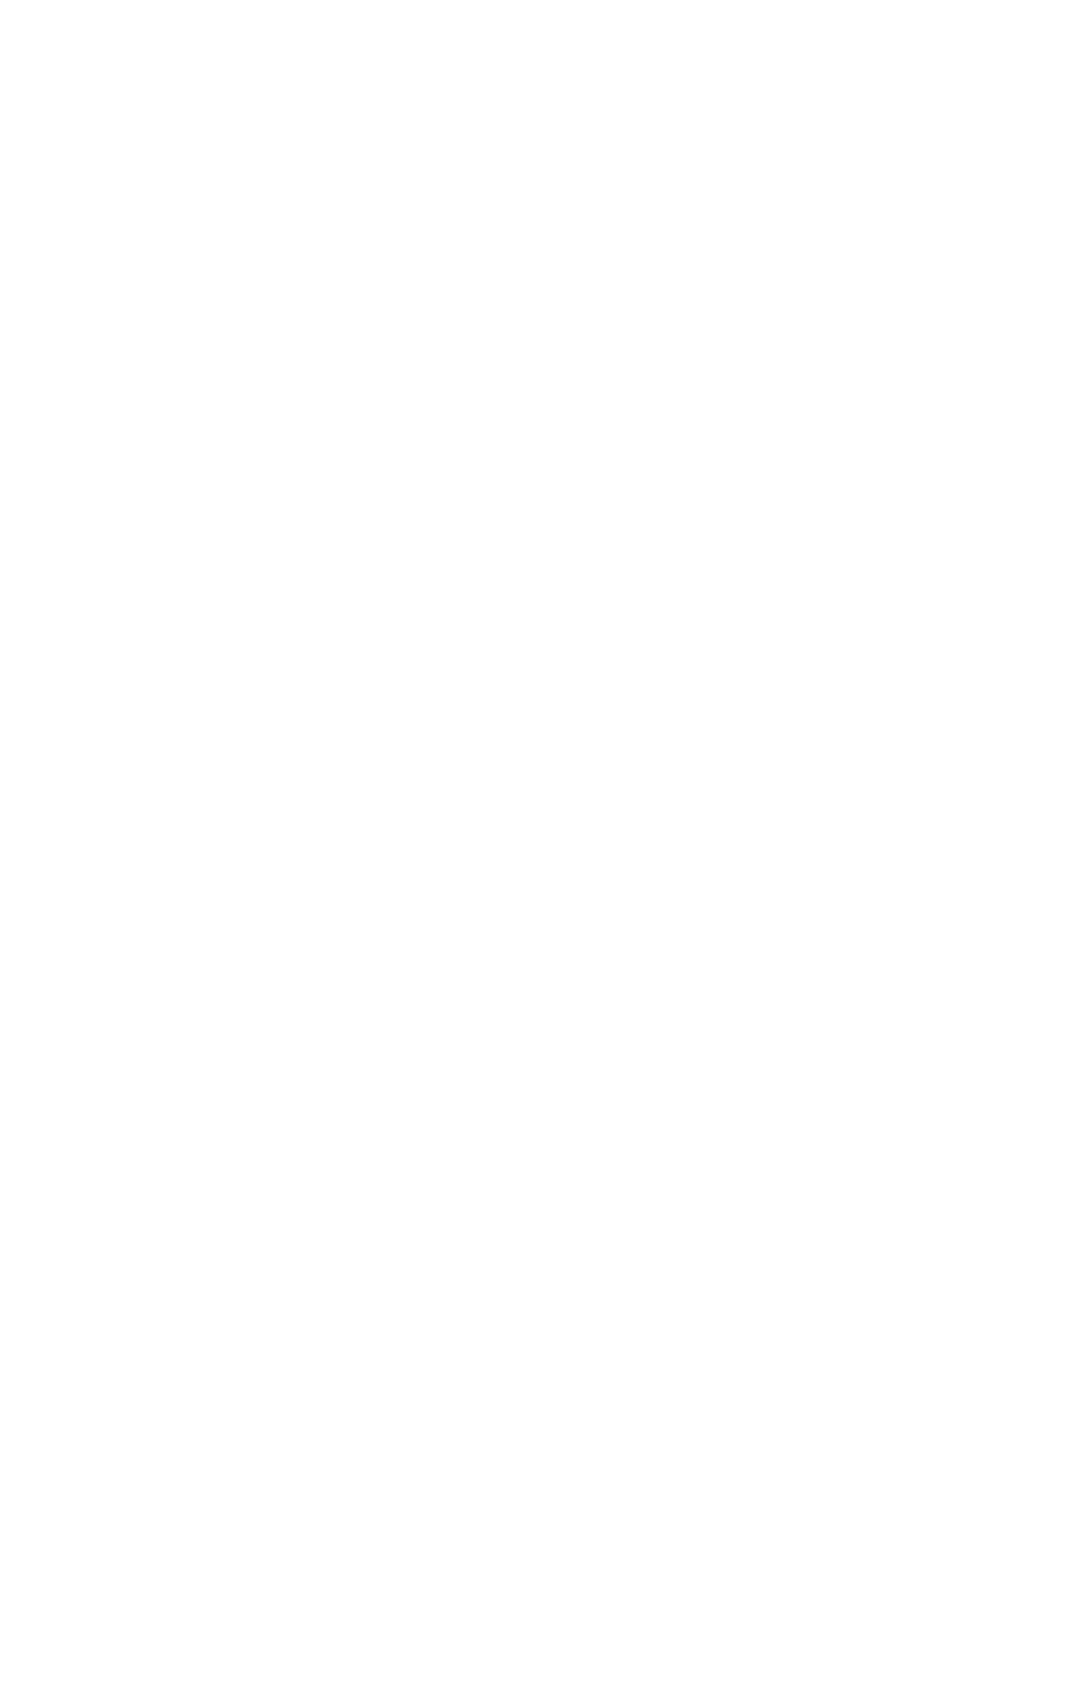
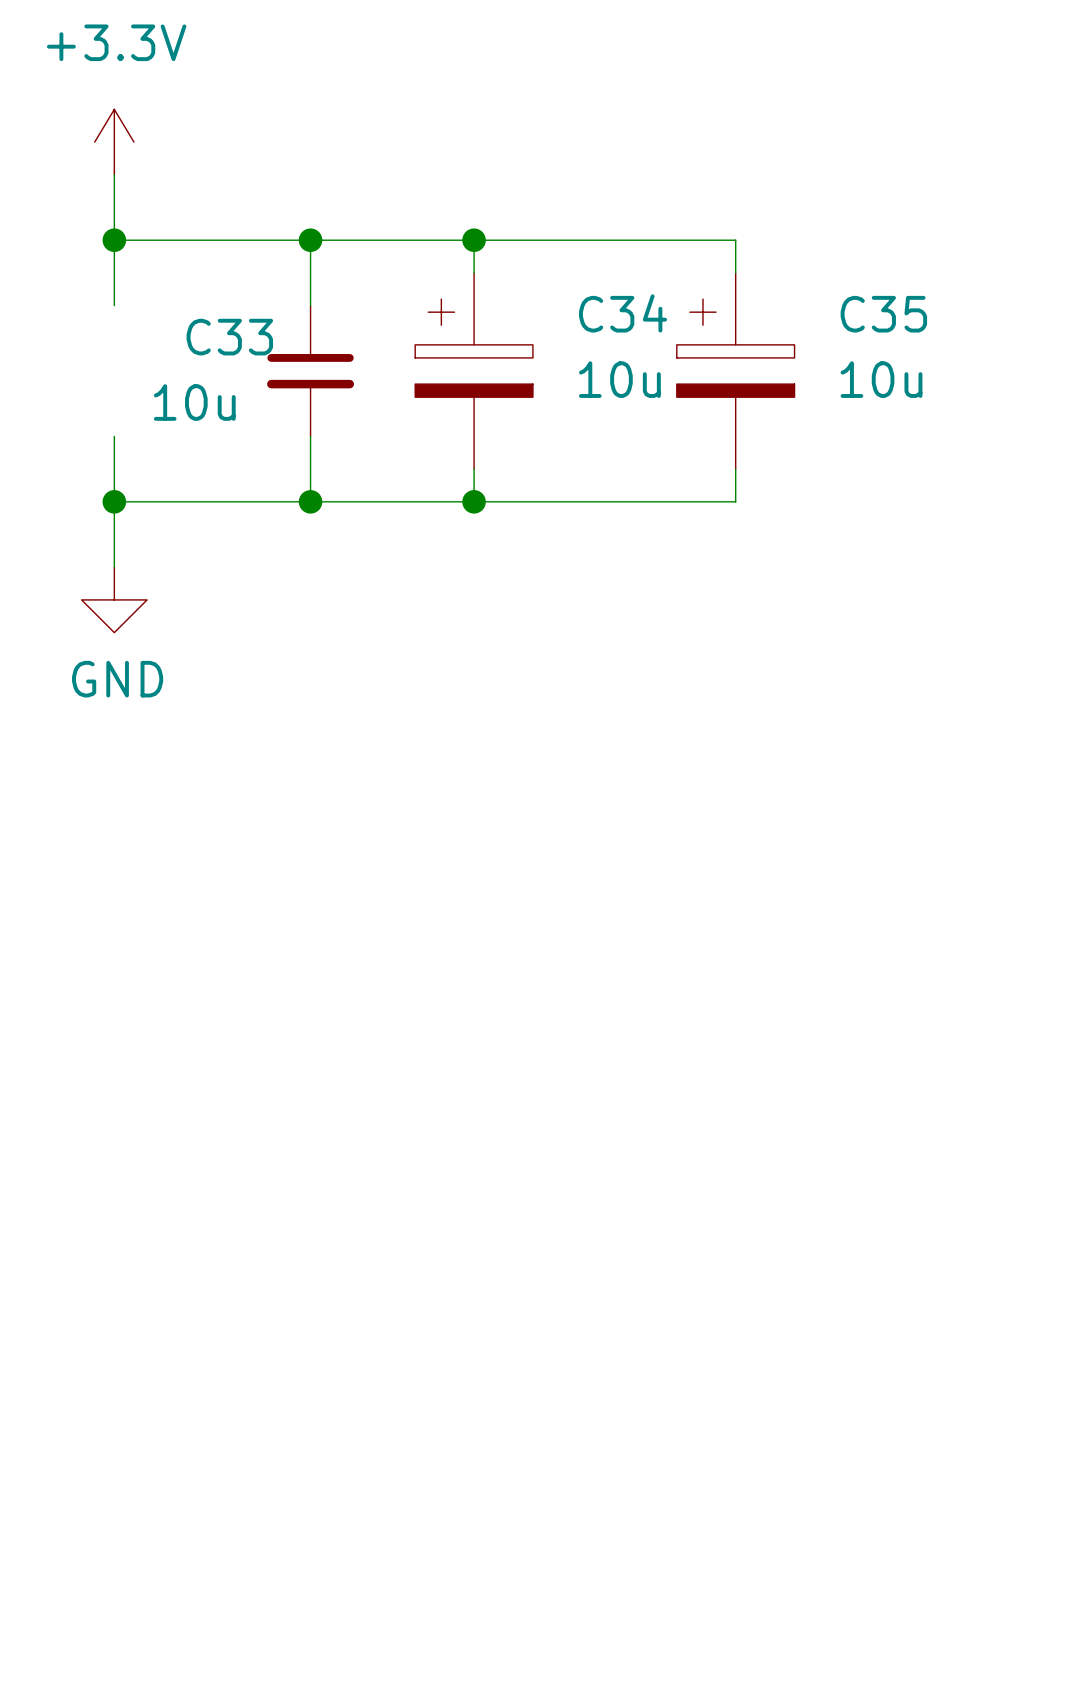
power symbol: none -> +3.3V (114, 142)
wire: none -> (114, 174) (114, 305)
wire: none -> (114, 240) (735, 240) (735, 272)
junction: none -> (114, 240)
wire: none -> (310, 240) (310, 305)
junction: none -> (310, 240)
wire: none -> (474, 240) (474, 272)
junction: none -> (474, 240)
C33: none -> 10u (310, 371)
C34: none -> 10u (474, 371)
C35: none -> 10u (735, 371)
wire: none -> (114, 436) (114, 567)
wire: none -> (310, 436) (310, 501)
wire: none -> (474, 469) (474, 501)
wire: none -> (735, 469) (735, 501) (114, 501)
junction: none -> (114, 501)
junction: none -> (310, 501)
junction: none -> (474, 501)
power symbol: none -> GND (114, 599)

